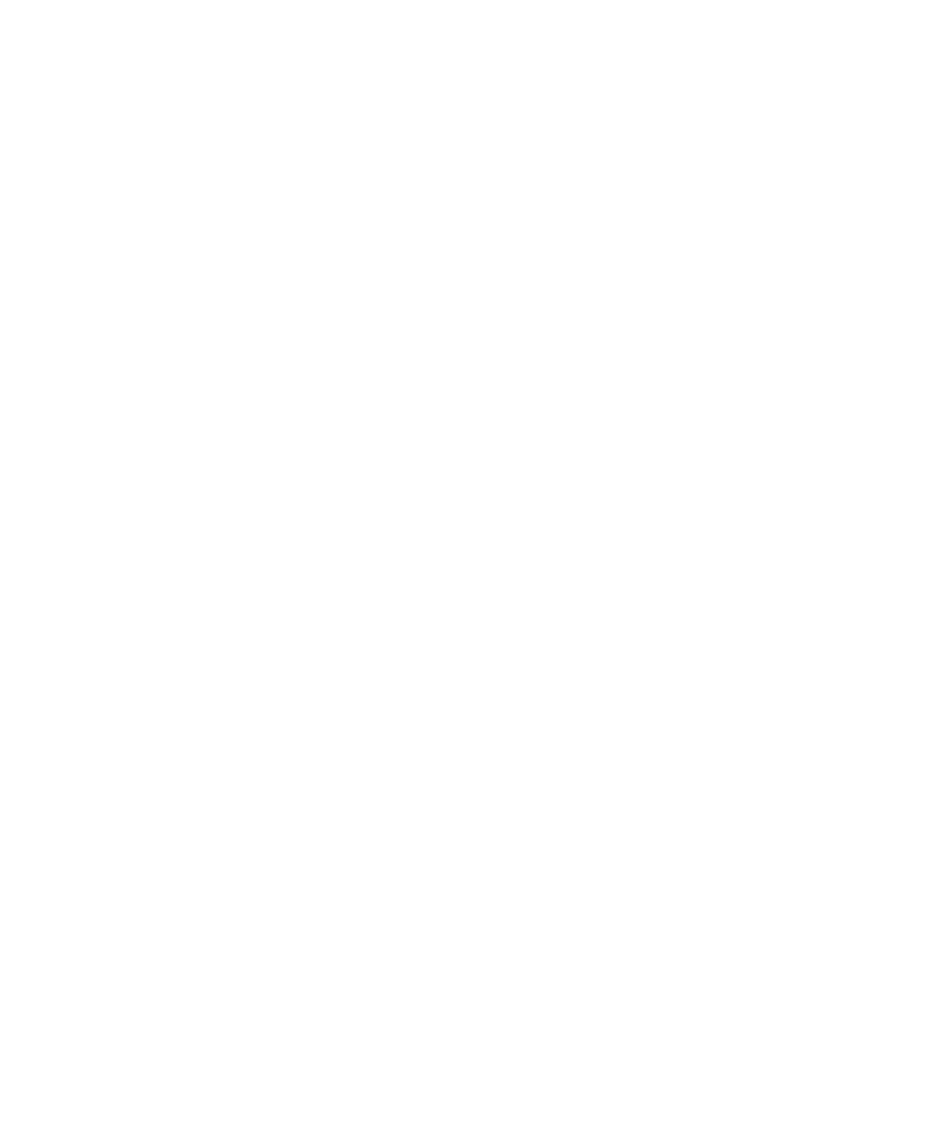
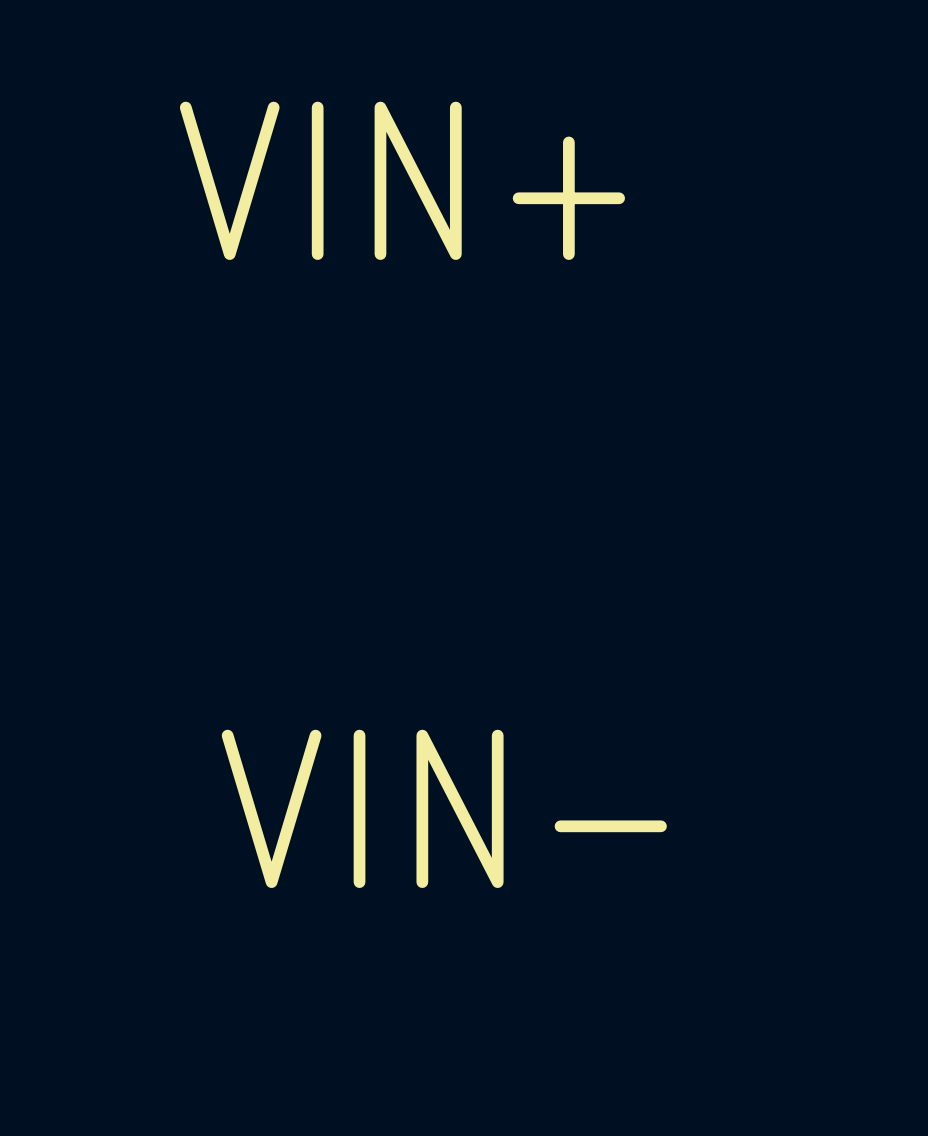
text: none -> VIN+ (402, 180)
text: none -> VIN- (444, 808)

